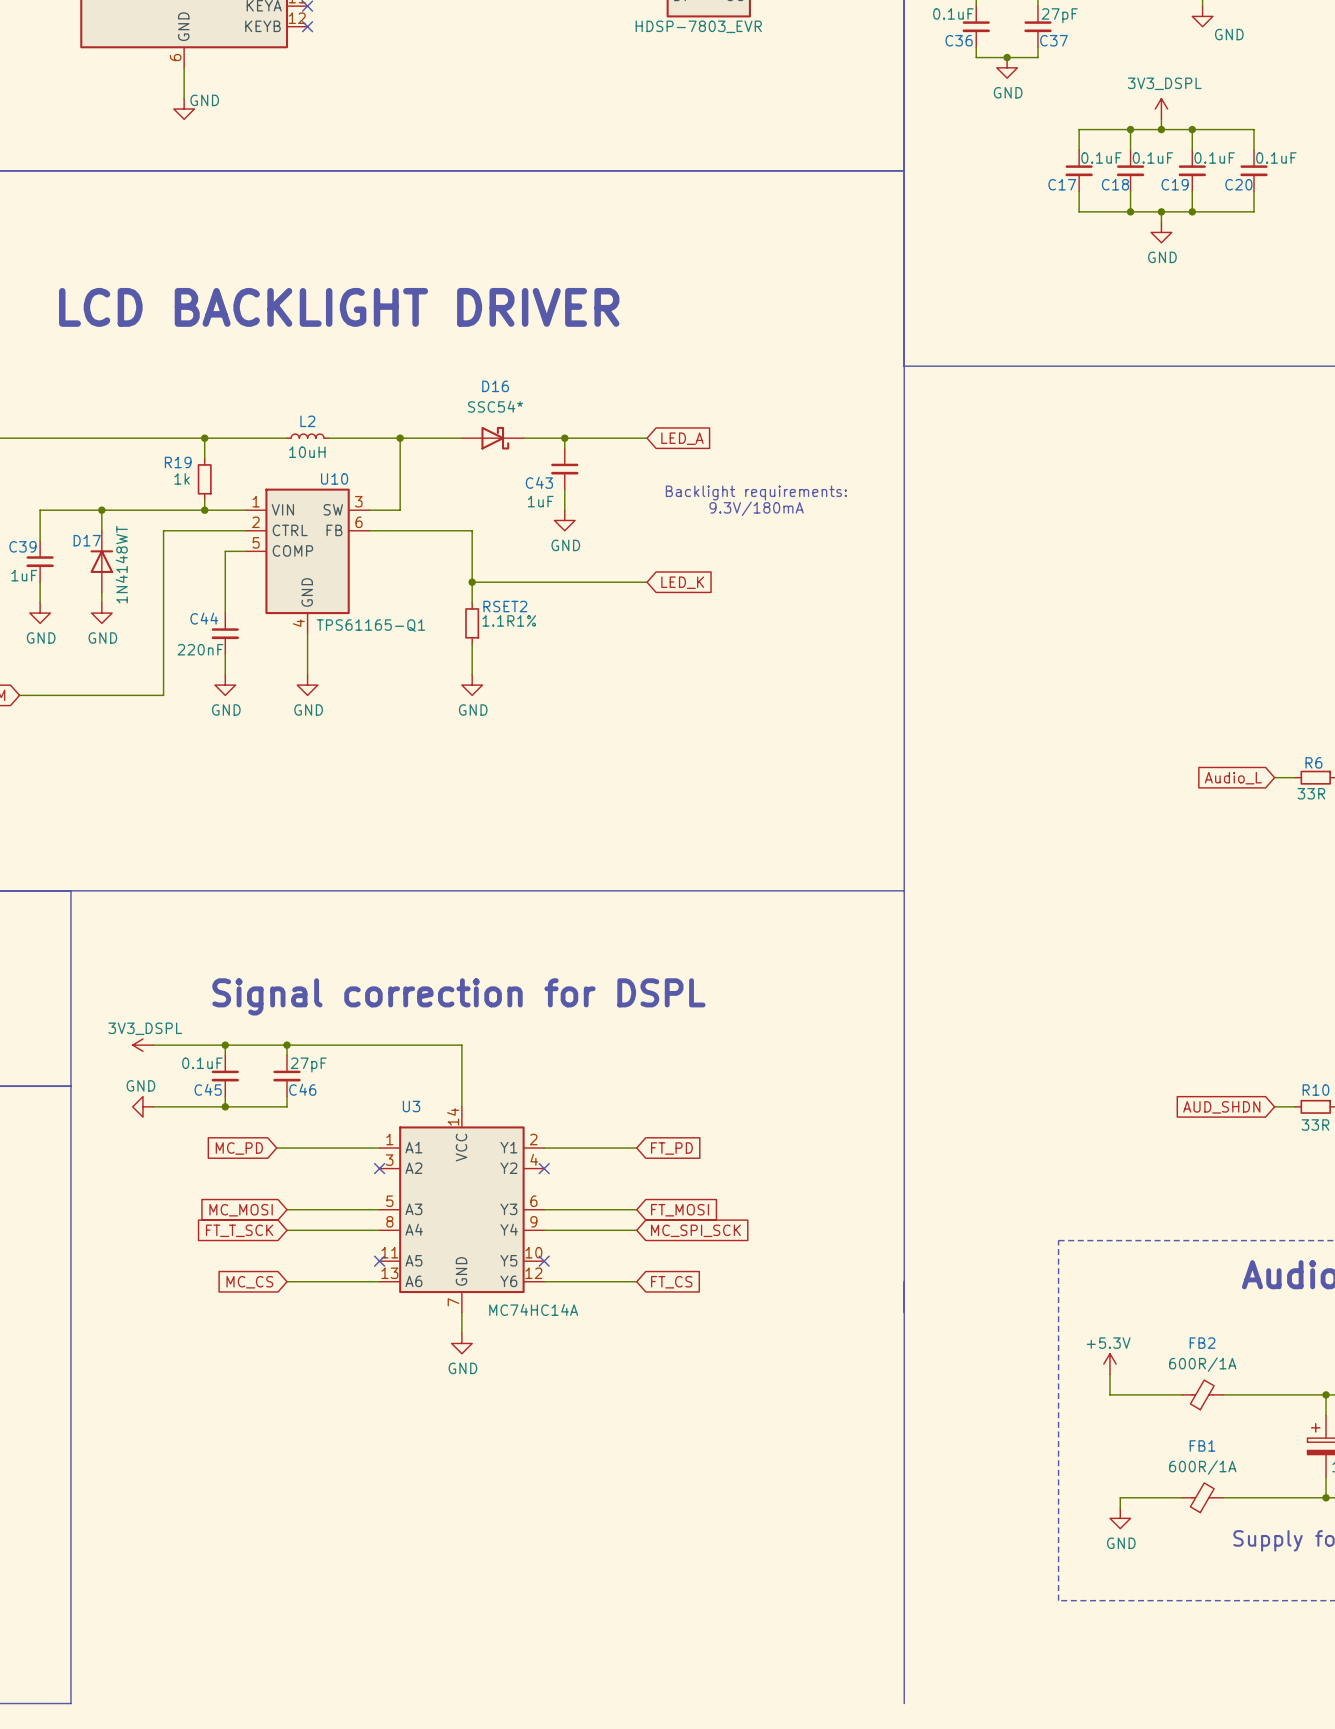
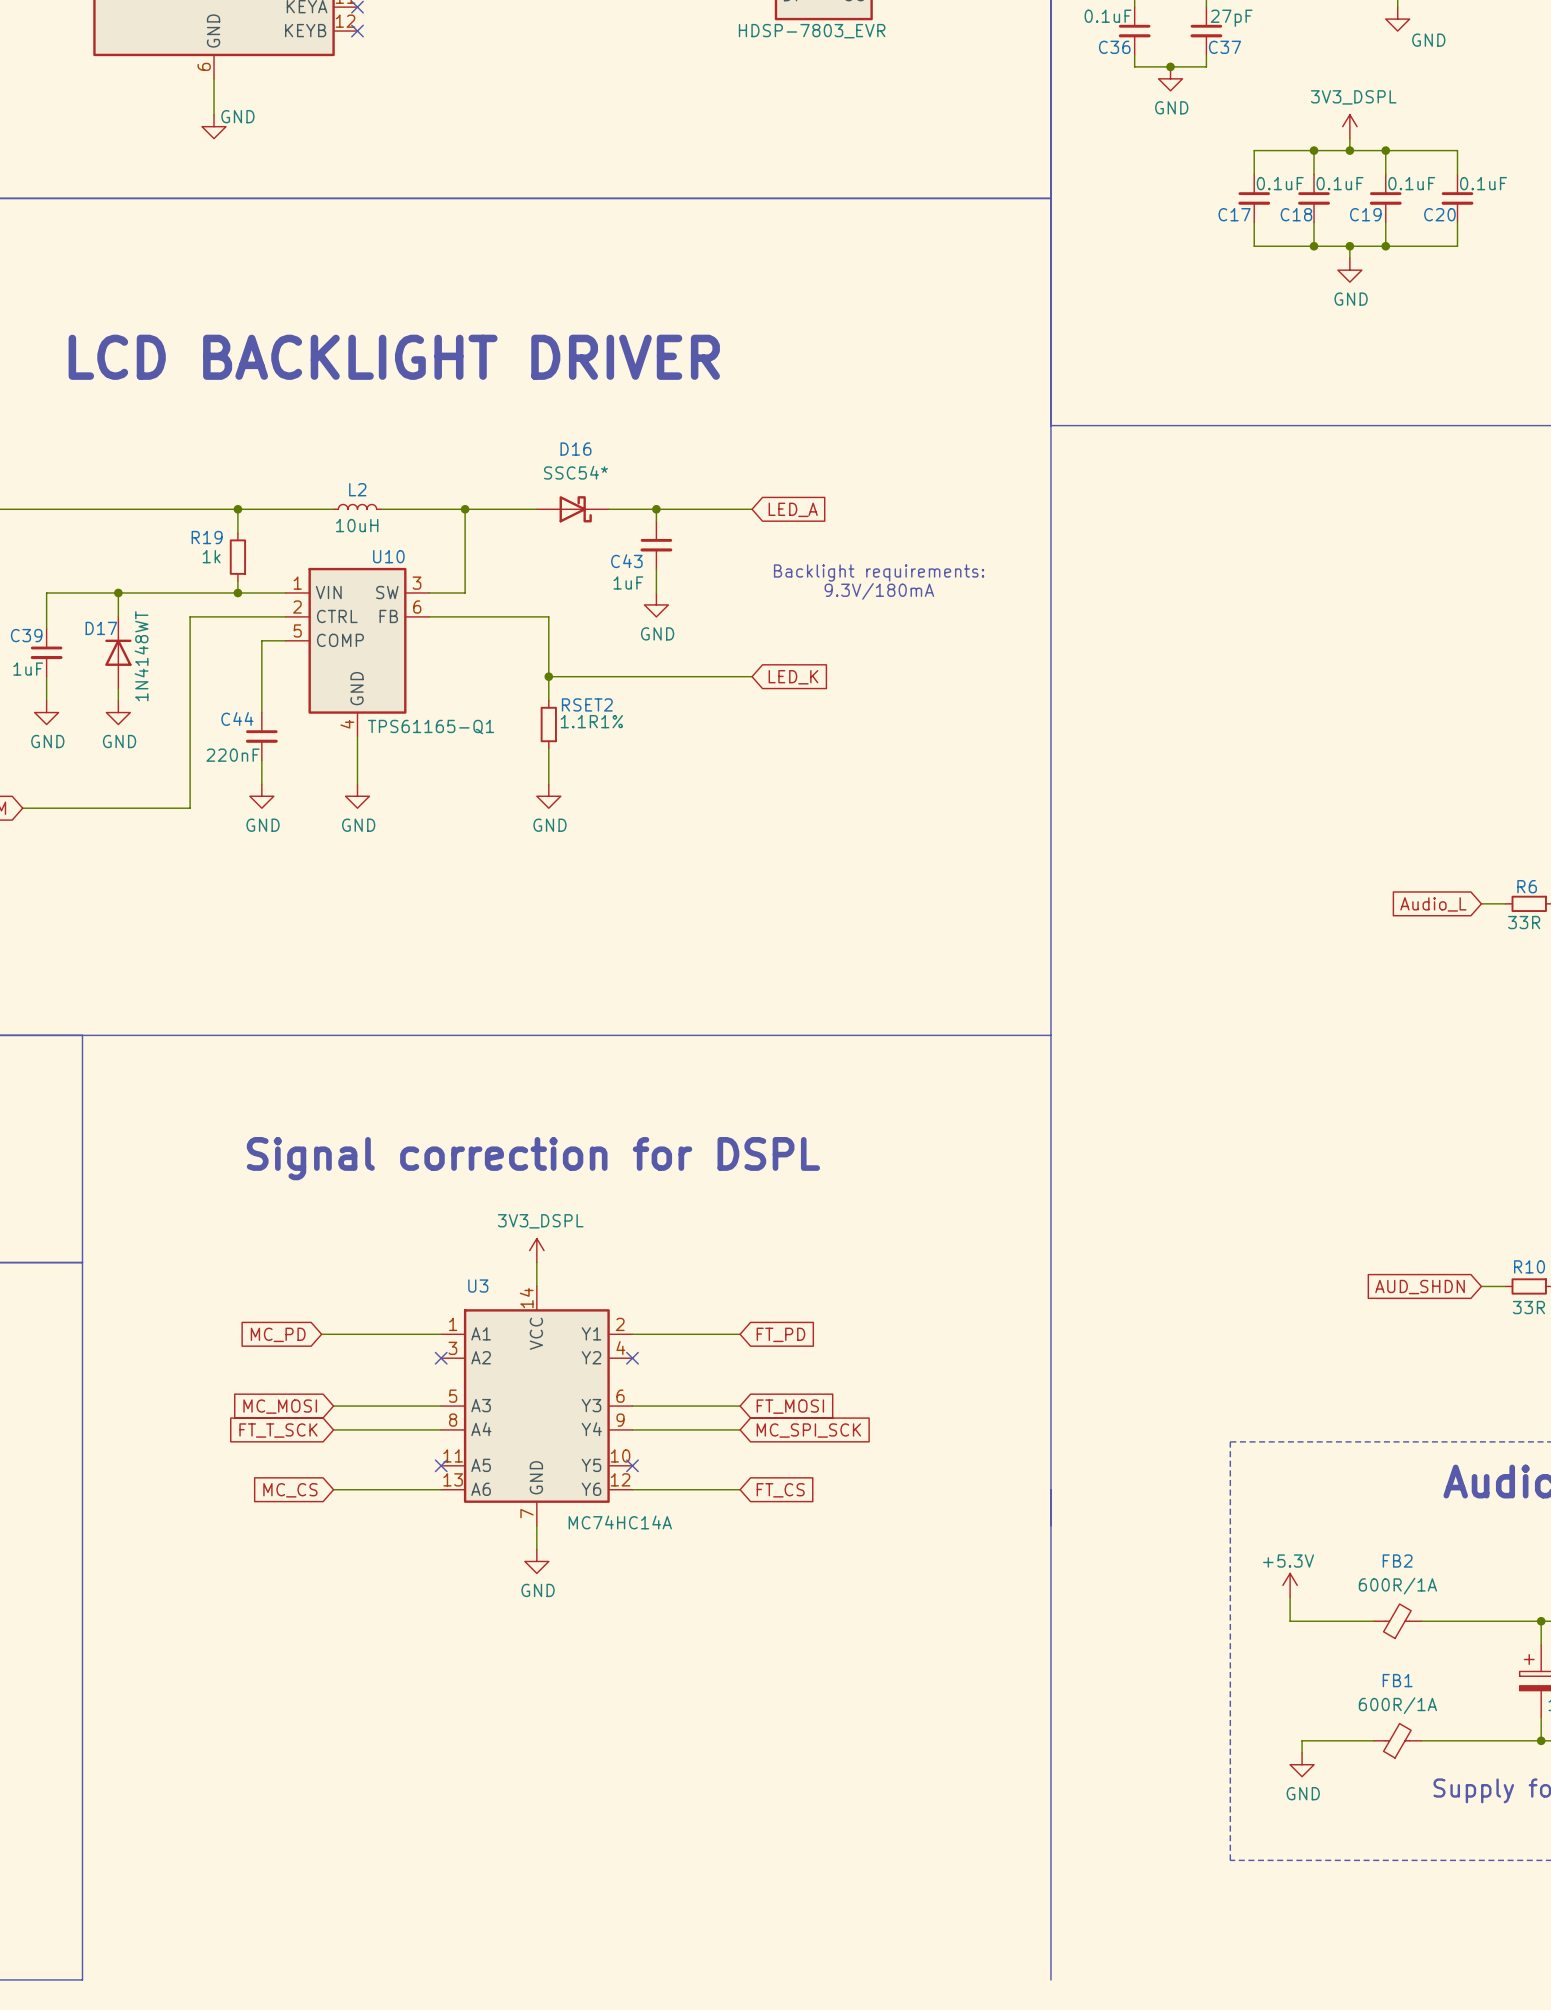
power symbol: 3V3_DSPL (142, 1045) -> none
wire: (153, 1045) (461, 1045) (461, 1086) -> none
wire: (225, 1045) (225, 1055) -> none
junction: (225, 1045) -> none
wire: (287, 1045) (287, 1055) -> none
junction: (287, 1045) -> none
C45: 0.1uF (225, 1076) -> none
C46: 27pF (287, 1076) -> none
power symbol: none -> 3V3_DSPL (536, 1250)
wire: (225, 1096) (225, 1106) -> none
wire: (287, 1096) (287, 1106) (153, 1106) -> none
power symbol: GND (142, 1106) -> none
junction: (225, 1106) -> none

